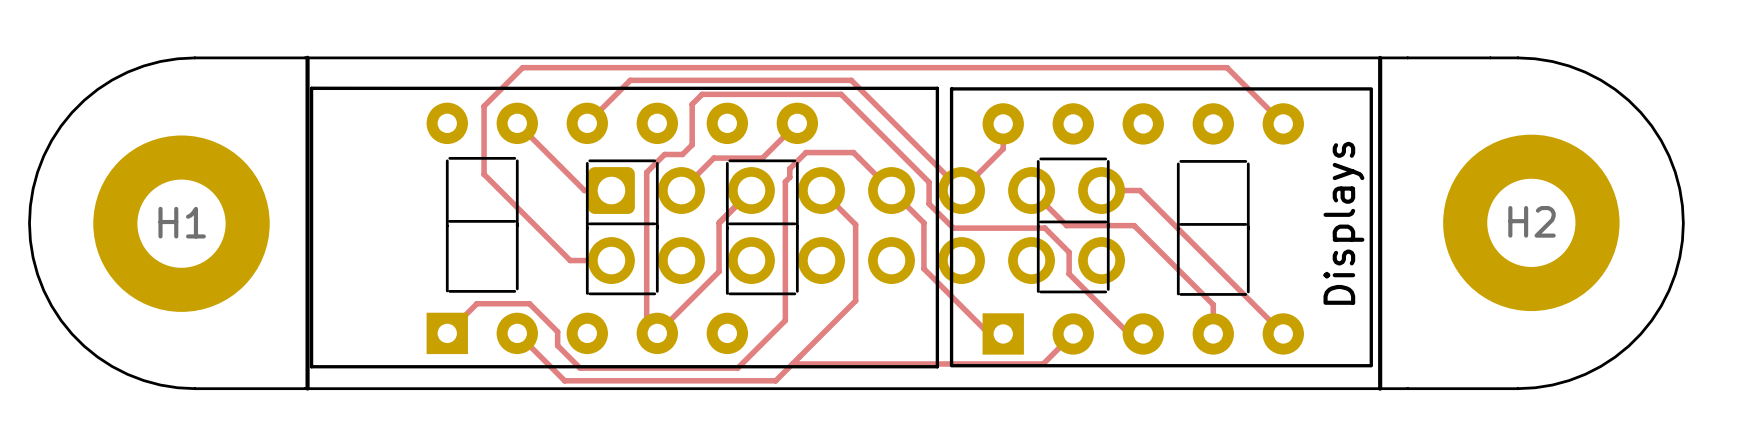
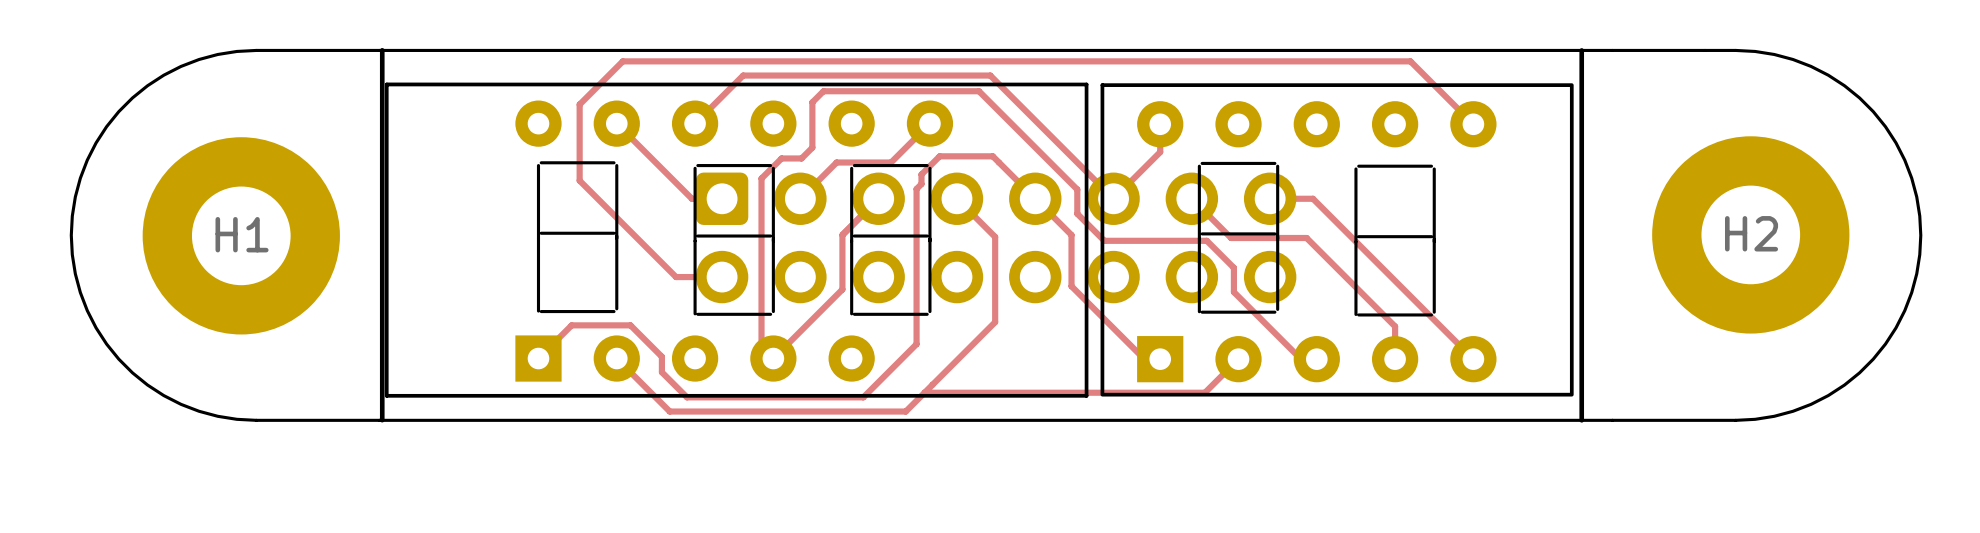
text: Displays (1343, 223) -> none

